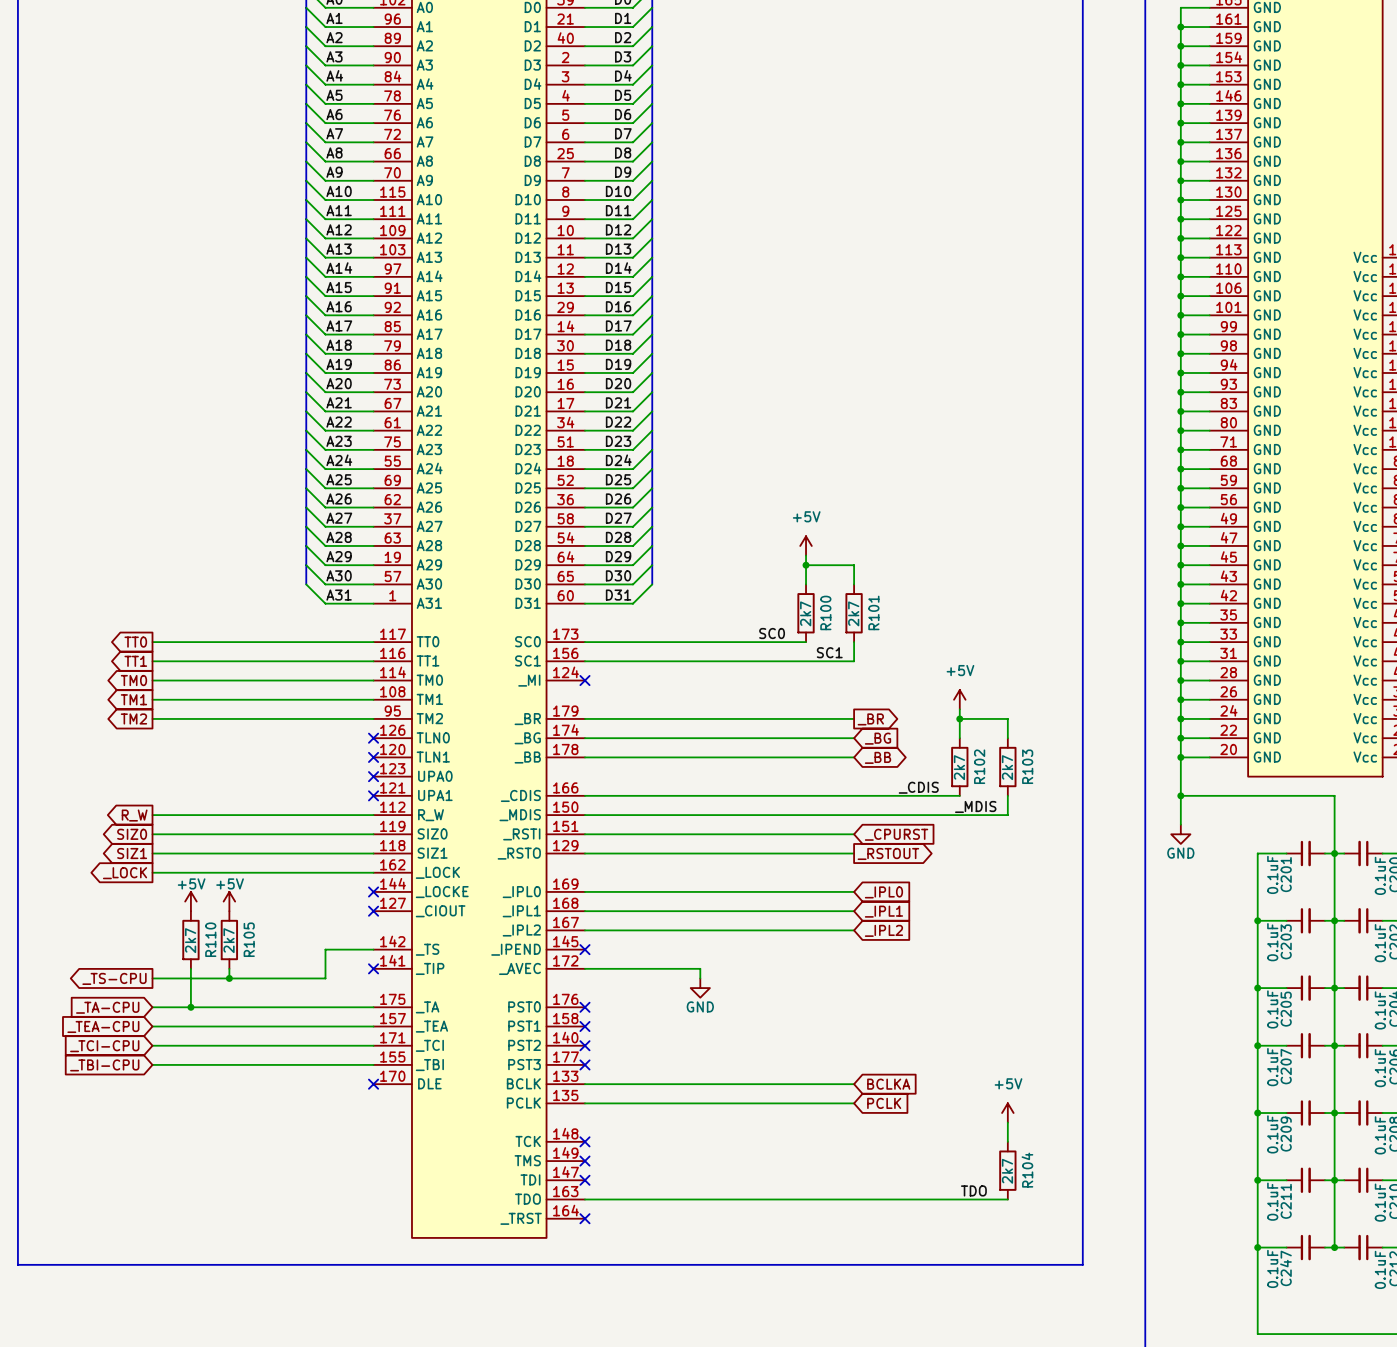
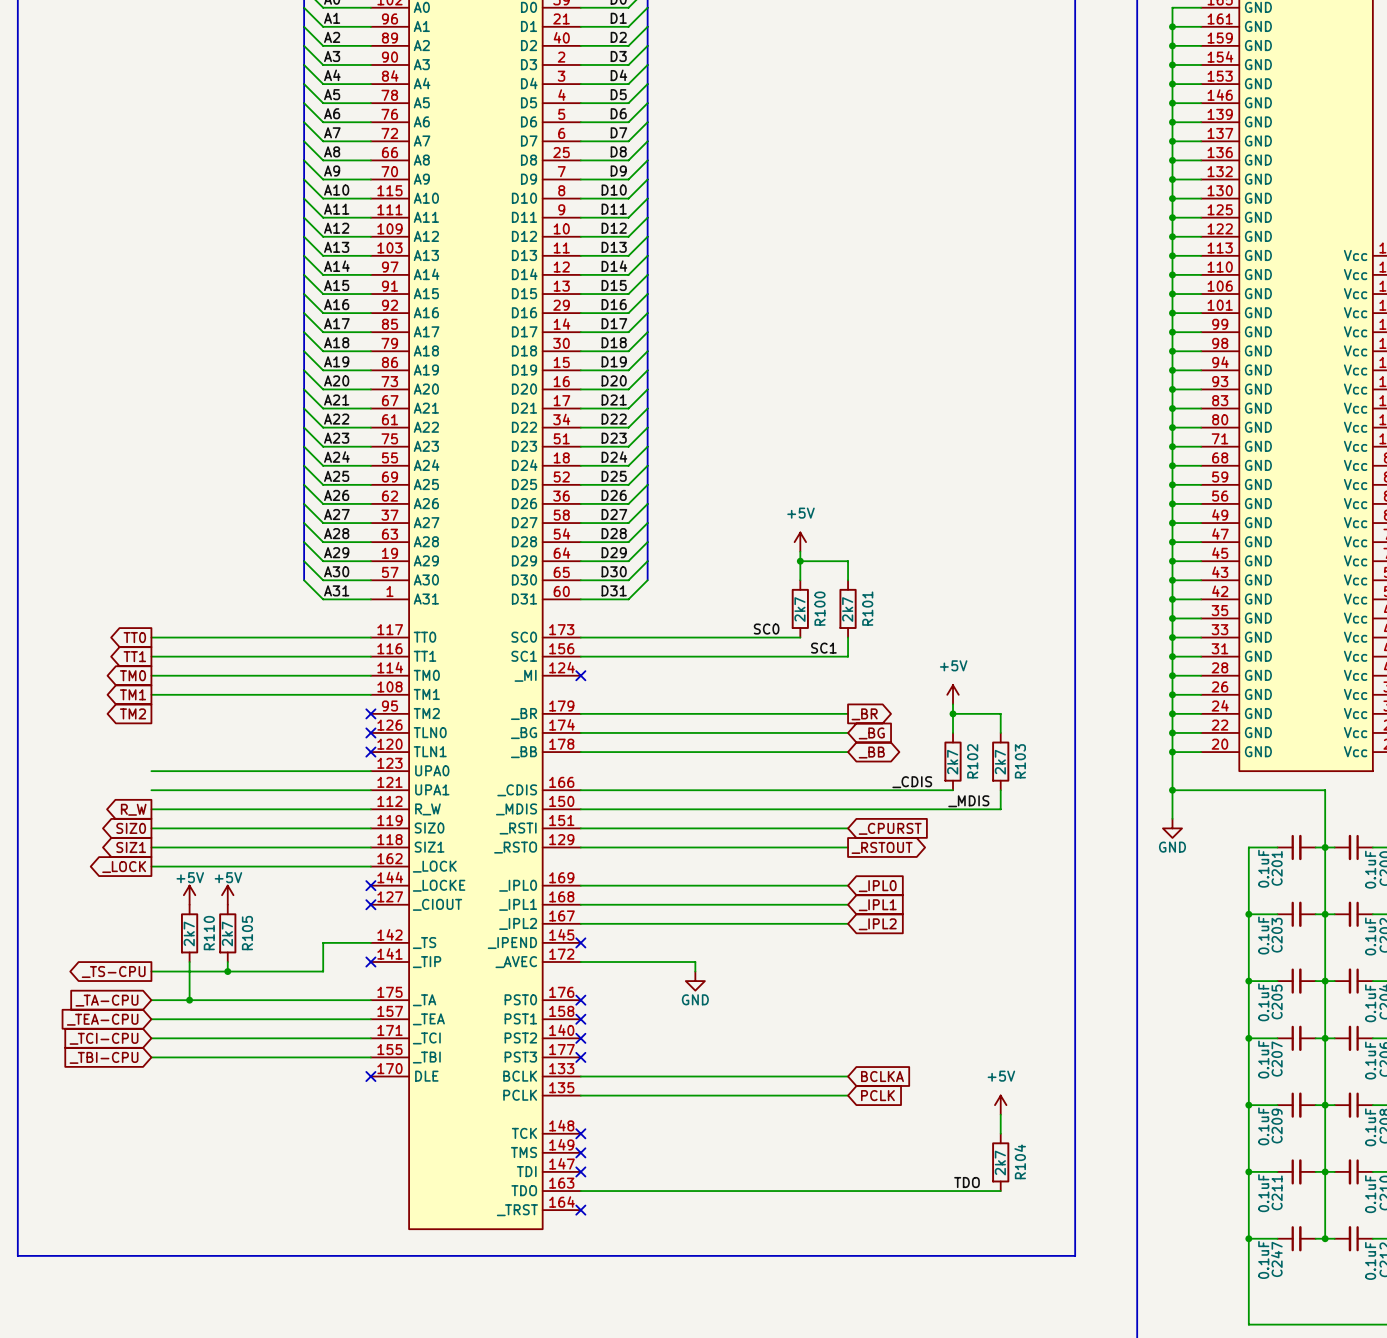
wire: (152, 718) (373, 718) -> (151, 771) (370, 771)
no-connect mark: none -> (370, 713)
no-connect mark: (373, 776) -> none
wire: none -> (151, 790) (370, 790)
no-connect mark: (373, 795) -> none

